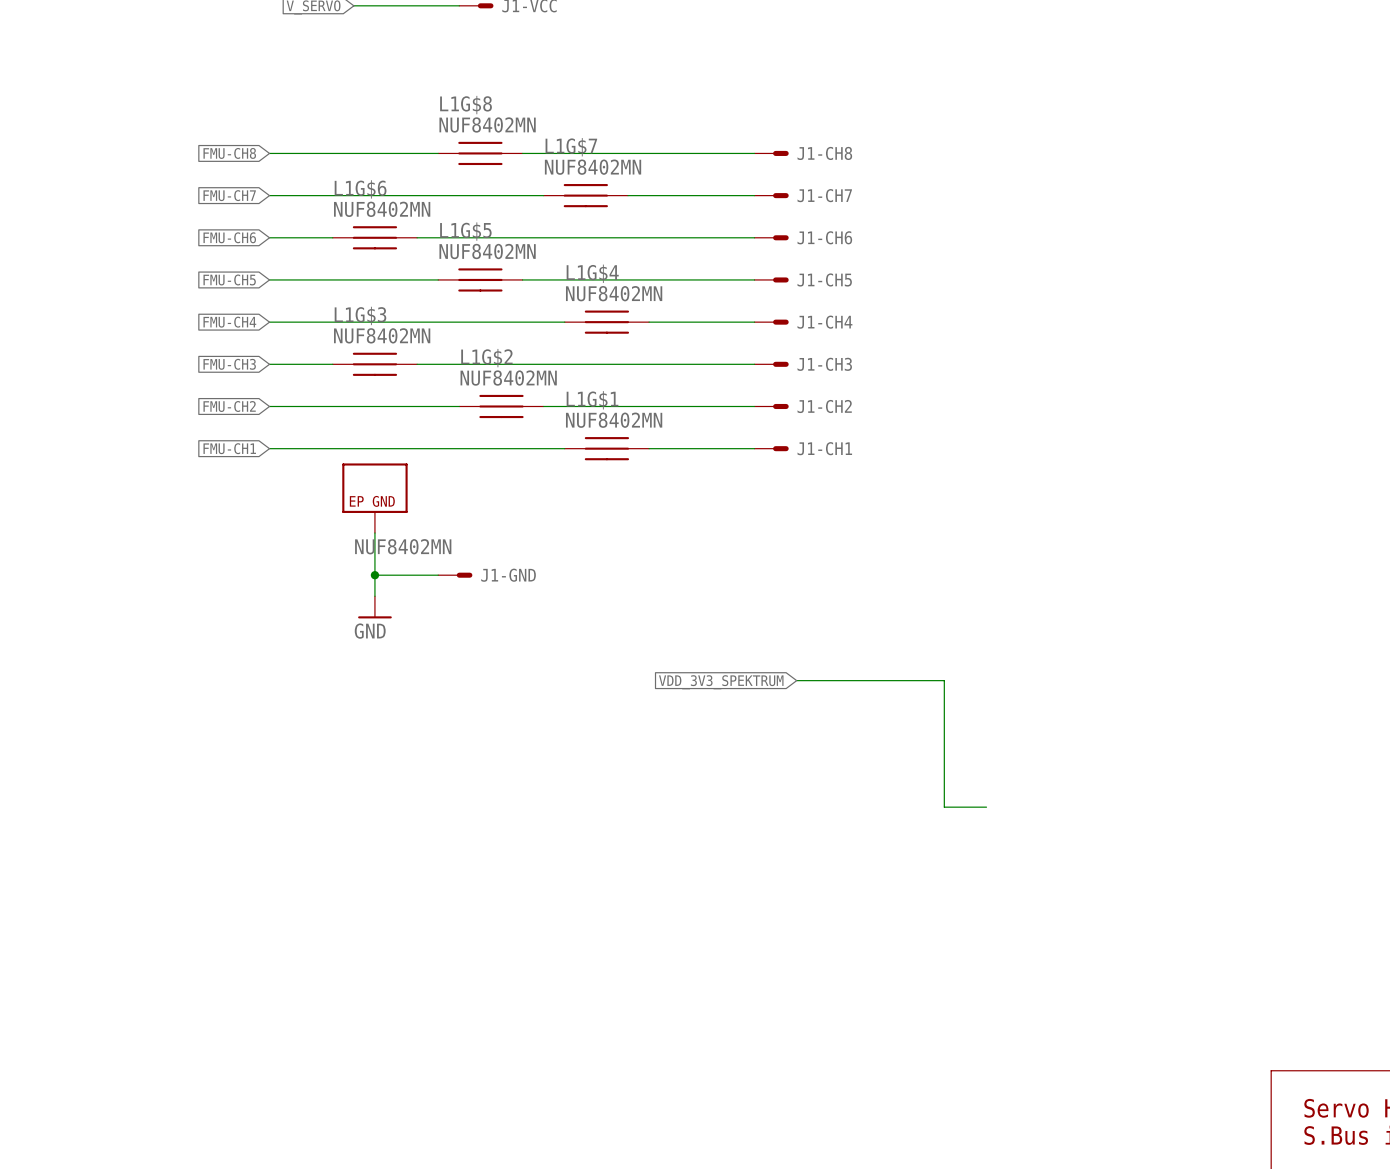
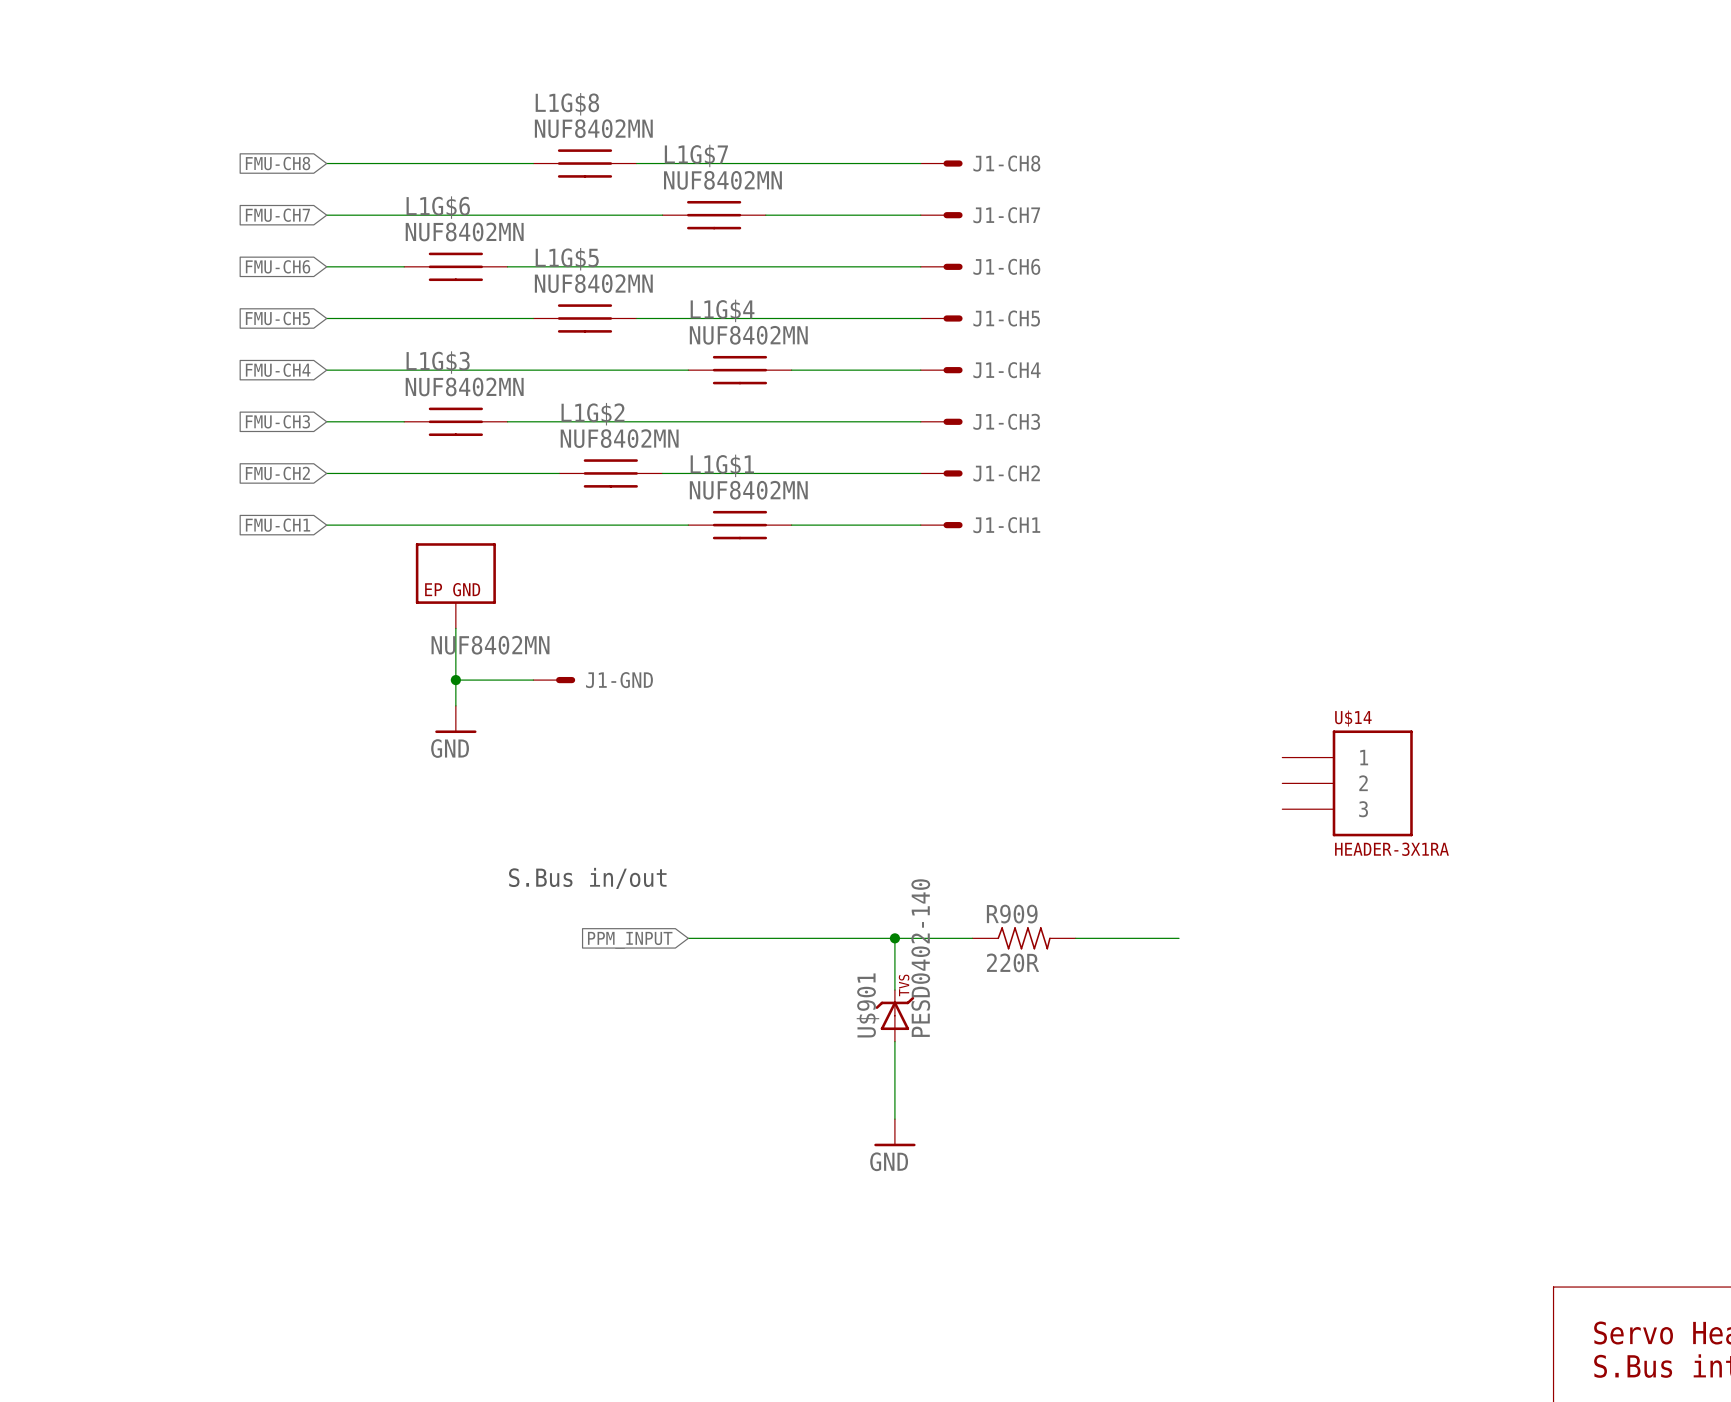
U$14: none -> HEADER-3X1RA (1347, 783)
wire: (796, 680) (944, 680) (944, 807) (986, 807) -> none
global label: VDD_3V3_SPEKTRUM (721, 682) -> none
text: none -> S.Bus in/out (587, 878)
wire: none -> (688, 938) (972, 938)
wire: none -> (894, 938) (894, 990)
junction: none -> (894, 938)
R909: none -> 220R (1024, 938)
wire: none -> (1075, 938) (1179, 938)
global label: none -> PPM_INPUT (630, 940)
U$901: none -> PESD0402-140 (894, 1015)
wire: none -> (894, 1041) (894, 1119)
power symbol: none -> GND (894, 1132)

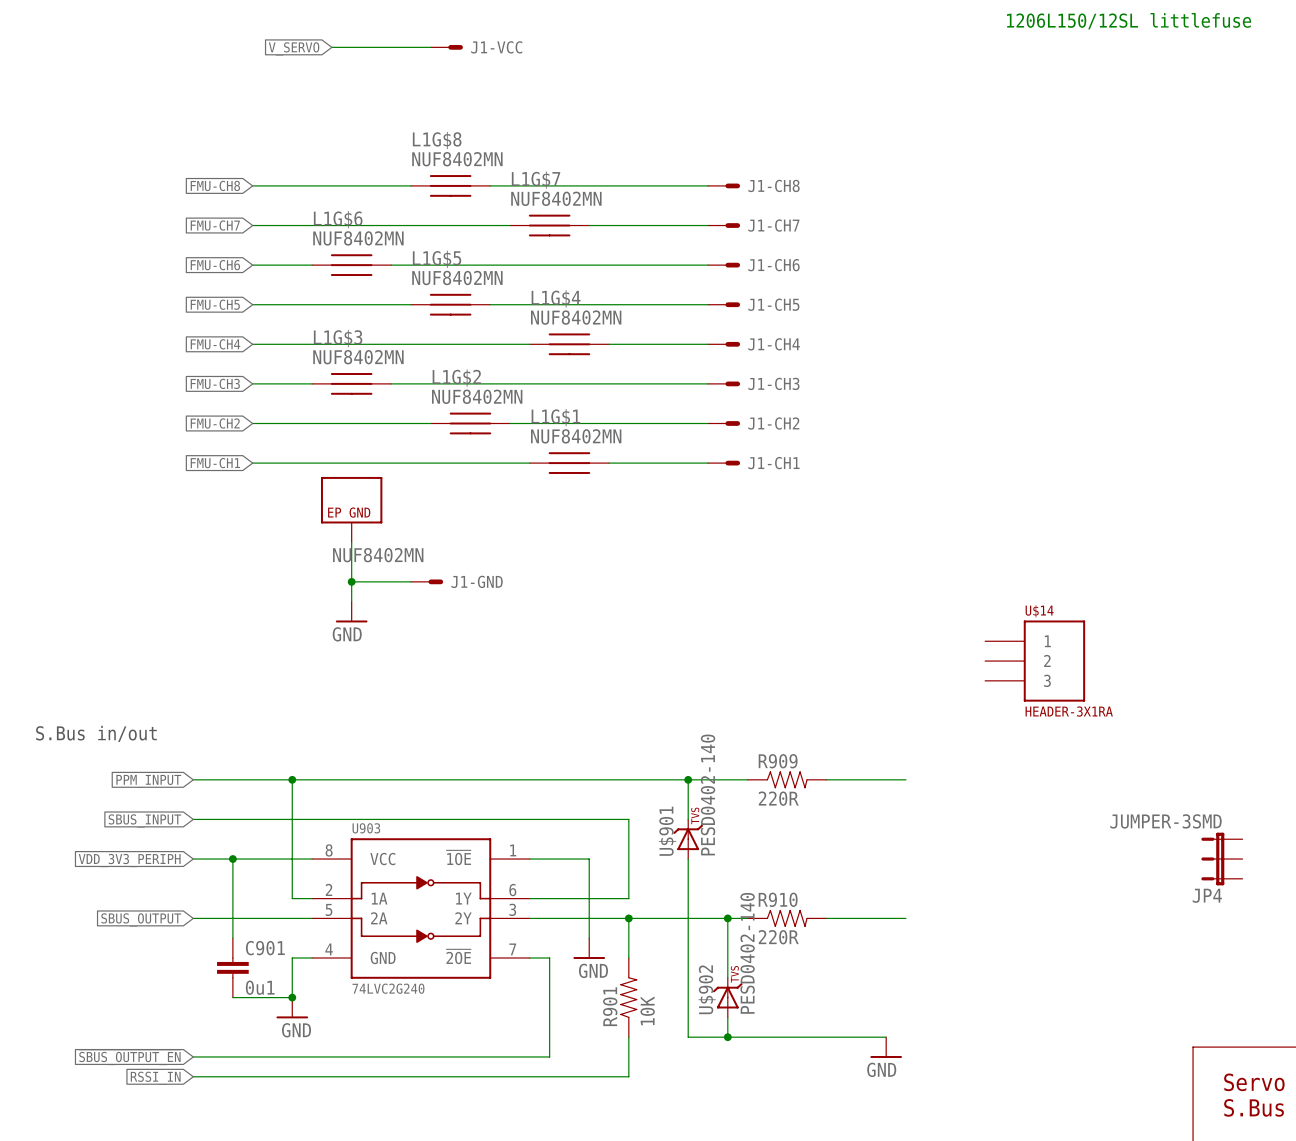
text: none -> S.Bus in/out (96, 733)
text: S.Bus in/out (587, 878) -> none
wire: none -> (193, 779) (529, 779)
wire: none -> (292, 779) (292, 898) (312, 898)
junction: none -> (292, 779)
global label: none -> PPM_INPUT (148, 781)
global label: PPM_INPUT (630, 940) -> none
wire: none -> (193, 819) (628, 819) (628, 898) (529, 898)
global label: none -> SBUS_INPUT (144, 820)
wire: none -> (193, 859) (312, 859)
wire: none -> (232, 859) (232, 938)
junction: none -> (232, 859)
wire: none -> (529, 859) (589, 859) (589, 938)
JP4: none -> JUMPER-3SMD (1221, 859)
global label: none -> VDD_3V3_PERIPH (129, 860)
U903: none -> 74LVC2G240 (420, 908)
wire: none -> (193, 918) (312, 918)
wire: none -> (529, 918) (747, 918)
wire: none -> (628, 918) (628, 958)
junction: none -> (628, 918)
wire: none -> (688, 918) (688, 1037) (886, 1037)
wire: none -> (727, 918) (727, 977)
junction: none -> (727, 918)
R910: none -> 220R (787, 918)
wire: none -> (826, 918) (905, 918)
global label: none -> SBUS_OUTPUT (141, 919)
power symbol position: GND (894, 1132) -> GND (589, 948)
power symbol text position: GND (889, 1161) -> GND (593, 970)
wire: none -> (312, 958) (292, 958) (292, 997) (232, 997)
wire: none -> (529, 958) (549, 958) (549, 1056) (193, 1056)
C901: none -> 0u1 (232, 967)
junction: none -> (292, 997)
R901: none -> 10K (628, 997)
U$902: none -> PESD0402-140 (727, 997)
power symbol: none -> GND (292, 1007)
wire: none -> (727, 1017) (727, 1037)
wire: none -> (628, 1037) (628, 1076) (193, 1076)
junction: none -> (727, 1037)
power symbol: none -> GND (886, 1047)
global label: none -> ~{SBUS_OUTPUT_EN} (129, 1057)
global label: none -> RSSI_IN (155, 1078)

